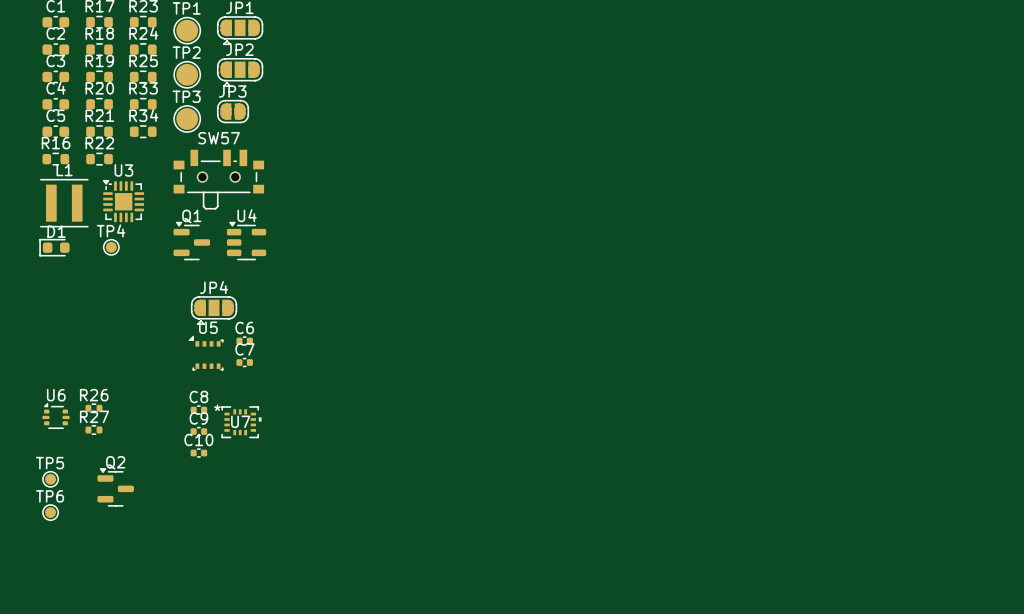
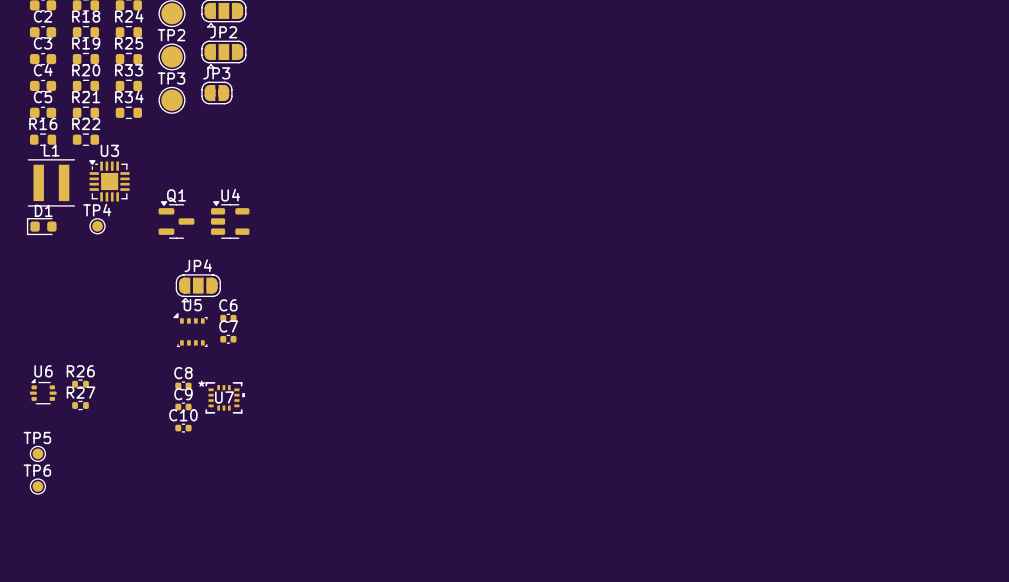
SW57: (218, 179) -> none
Q2: (115, 487) -> none

